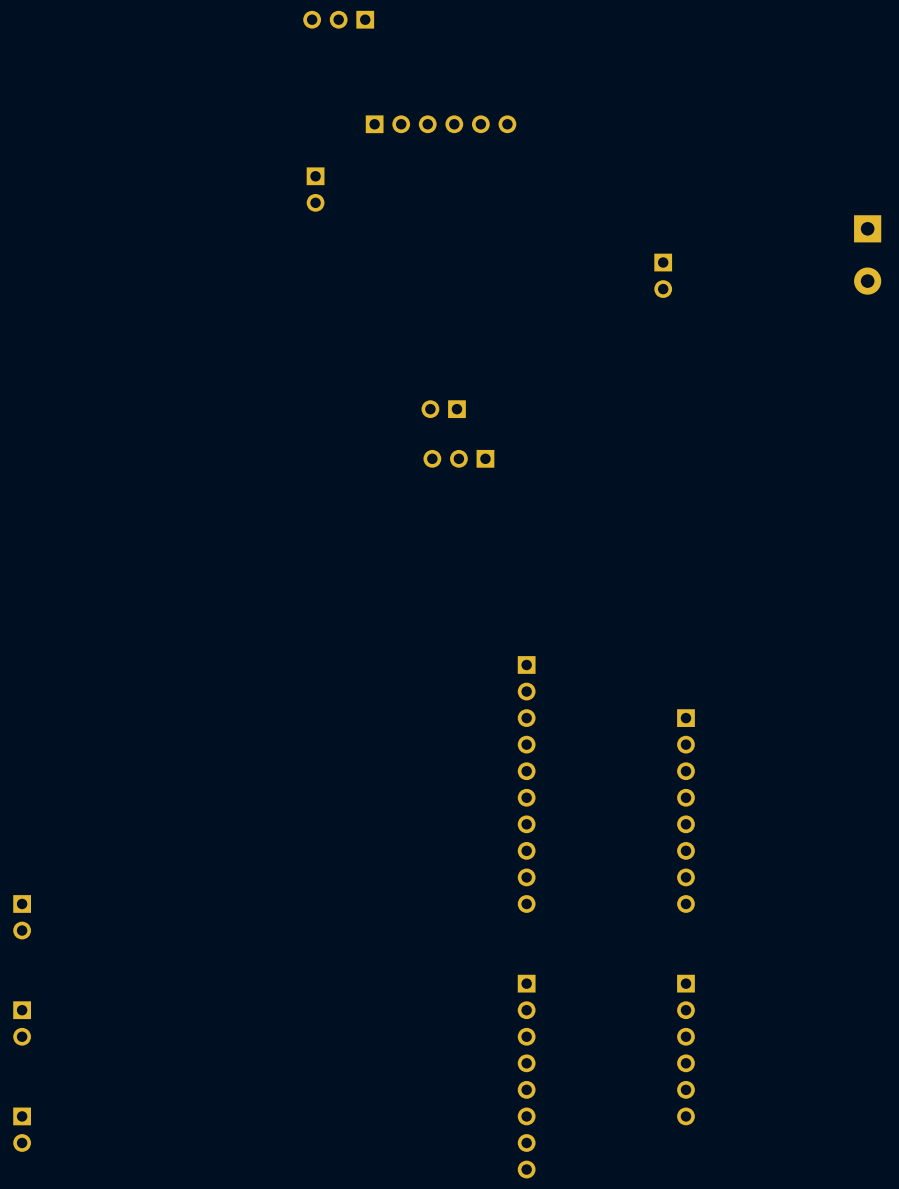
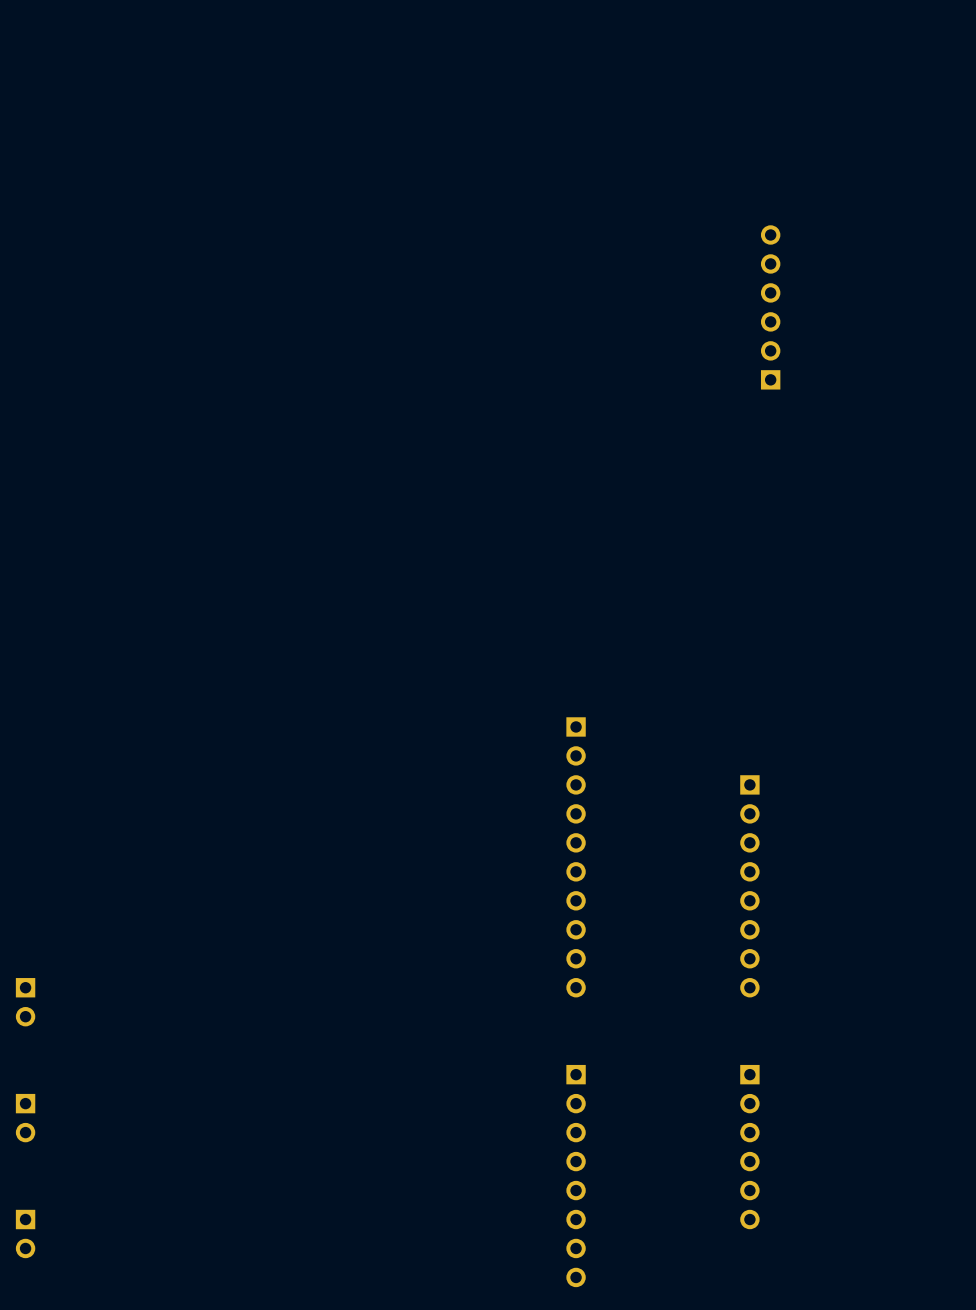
part: (338, 19) -> none
part: (441, 124) -> none
part: (315, 189) -> none
part: (867, 254) -> none
part: (663, 275) -> none
part: none -> (770, 307)
part: (443, 409) -> none
part: (458, 458) -> none

